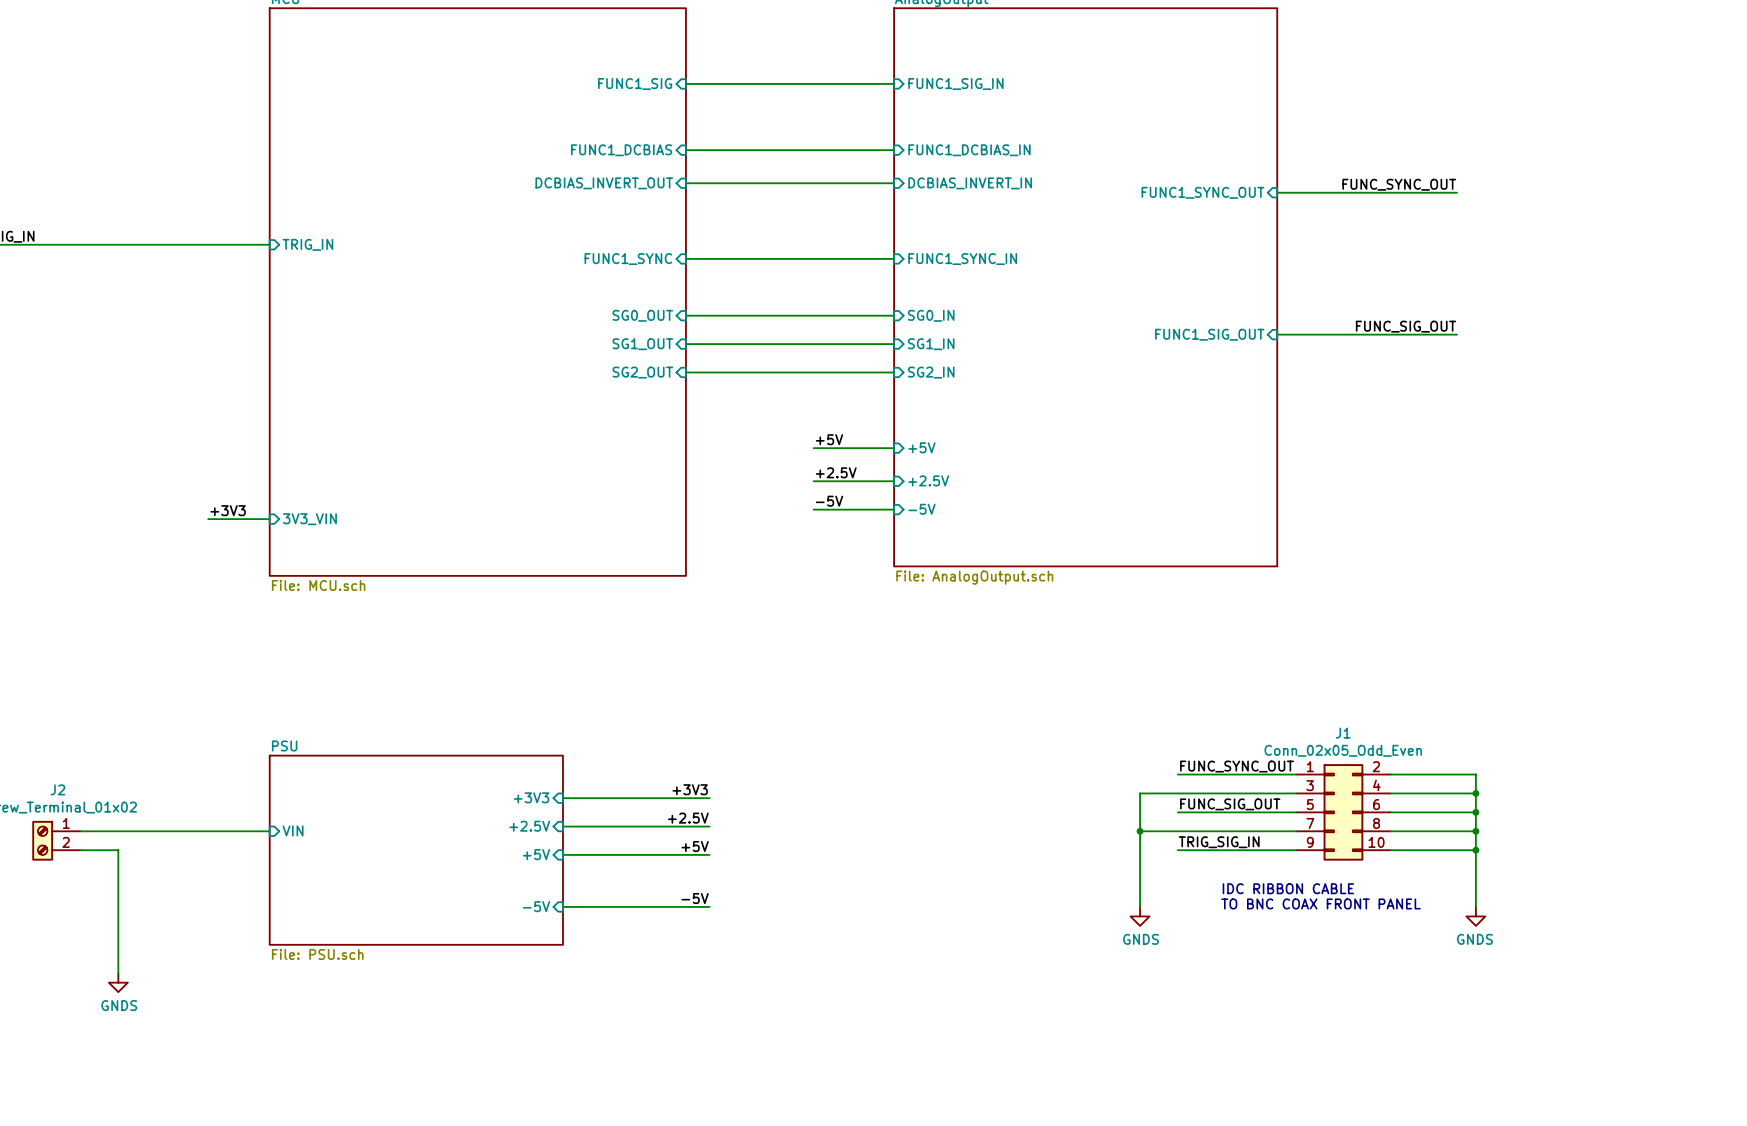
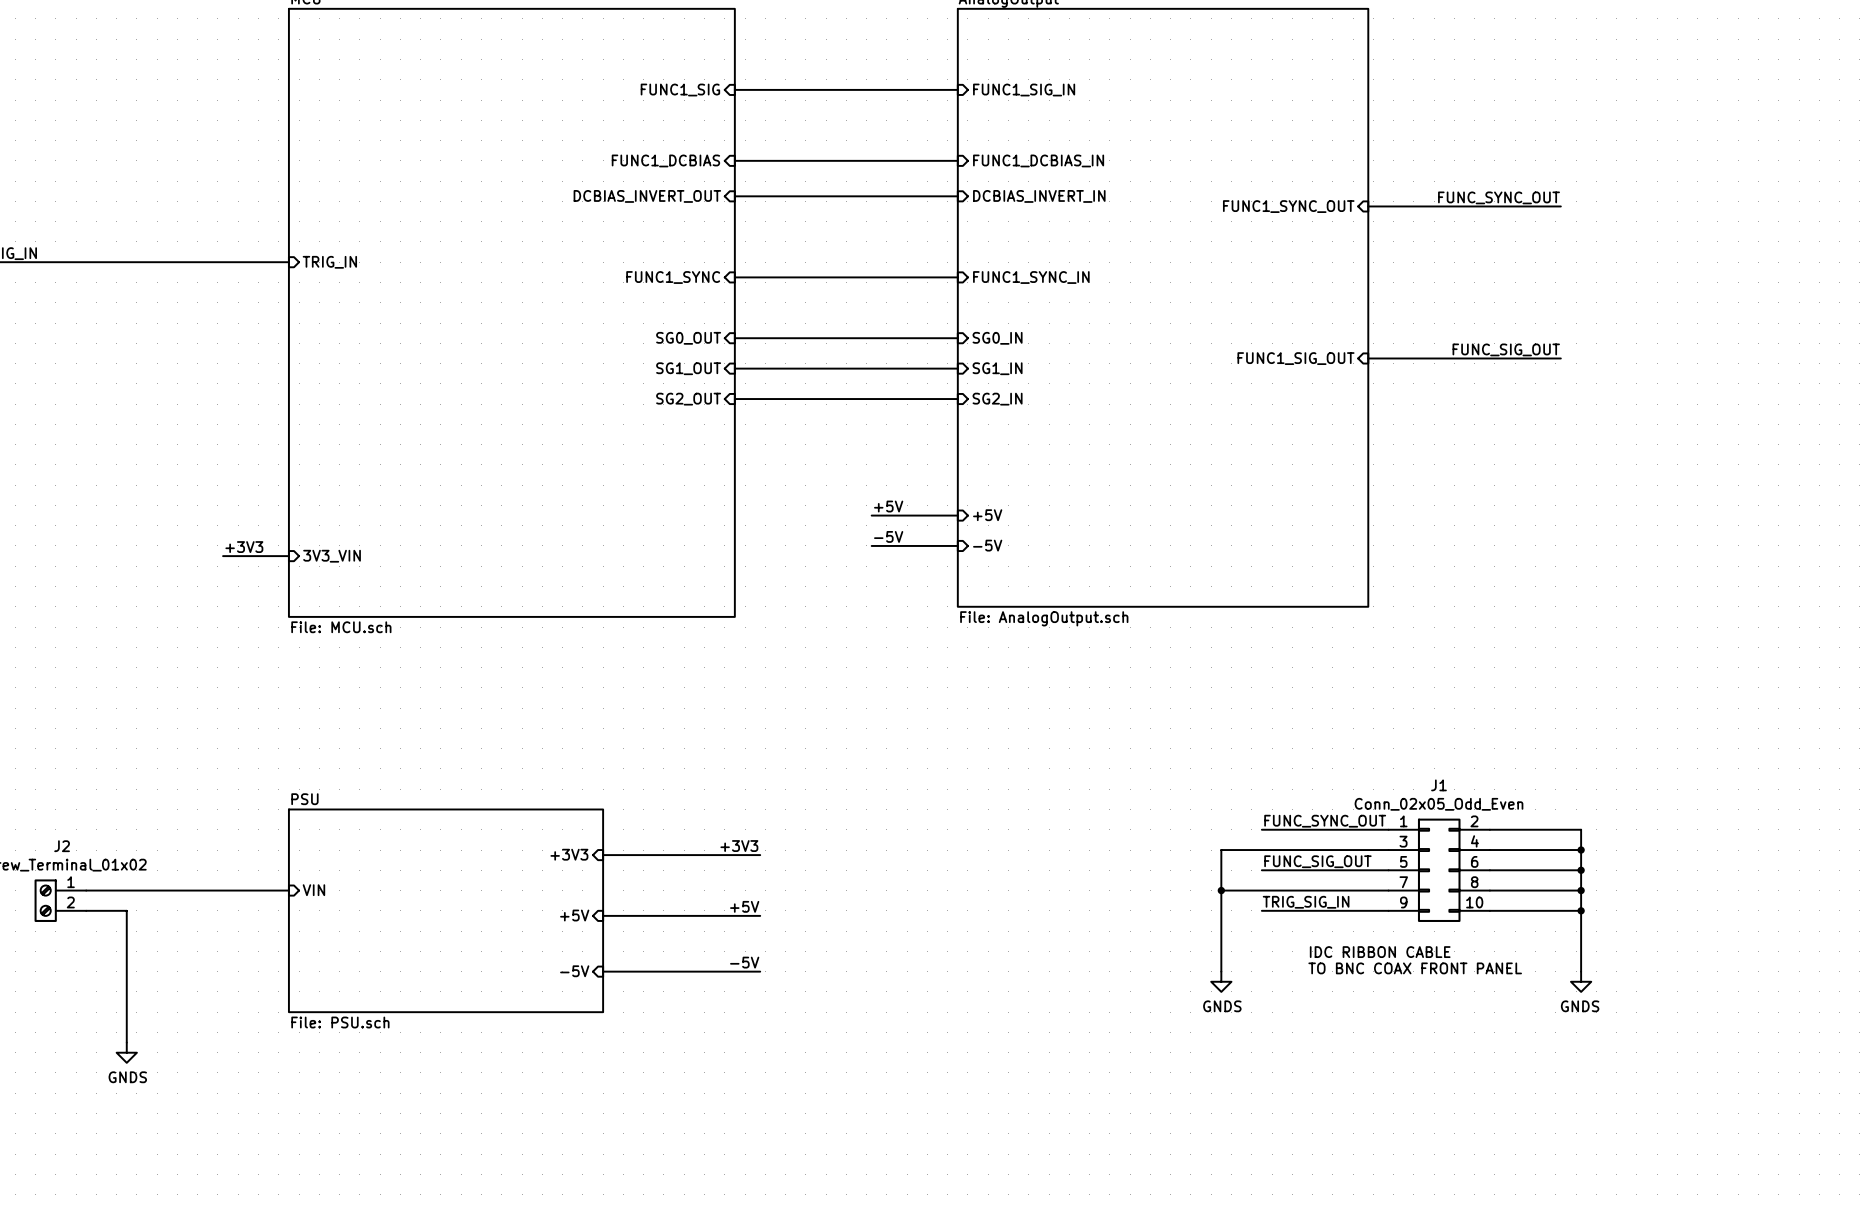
label: +5V (829, 439) -> none
sheet pin: +5V (921, 447) -> none
wire: (813, 448) (894, 448) -> none
label: +2.5V (836, 472) -> +5V (888, 506)
sheet pin: +2.5V (928, 480) -> +5V (987, 515)
label: +2.5V (688, 818) -> none
sheet pin: +2.5V (529, 826) -> none
wire: (562, 826) (709, 826) -> none

